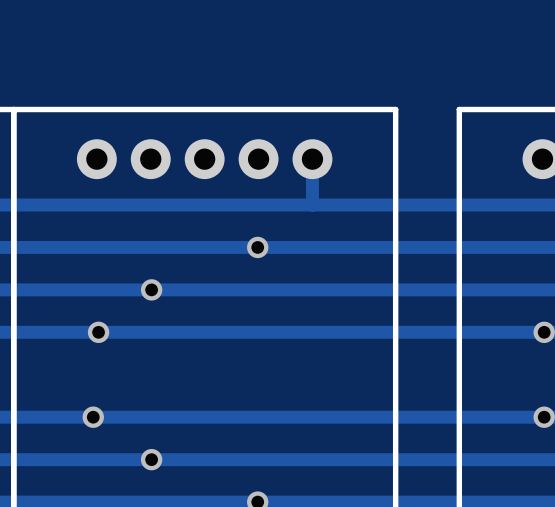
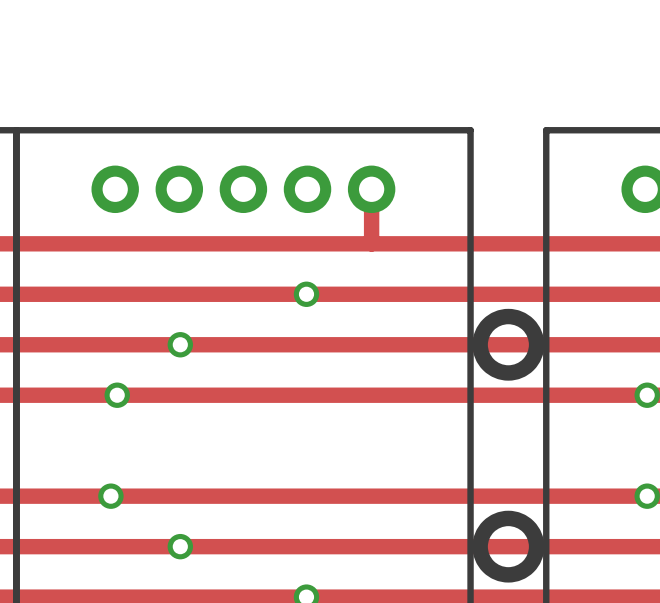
drawing: none -> [472, 308, 545, 381]
drawing: none -> [472, 510, 545, 583]

